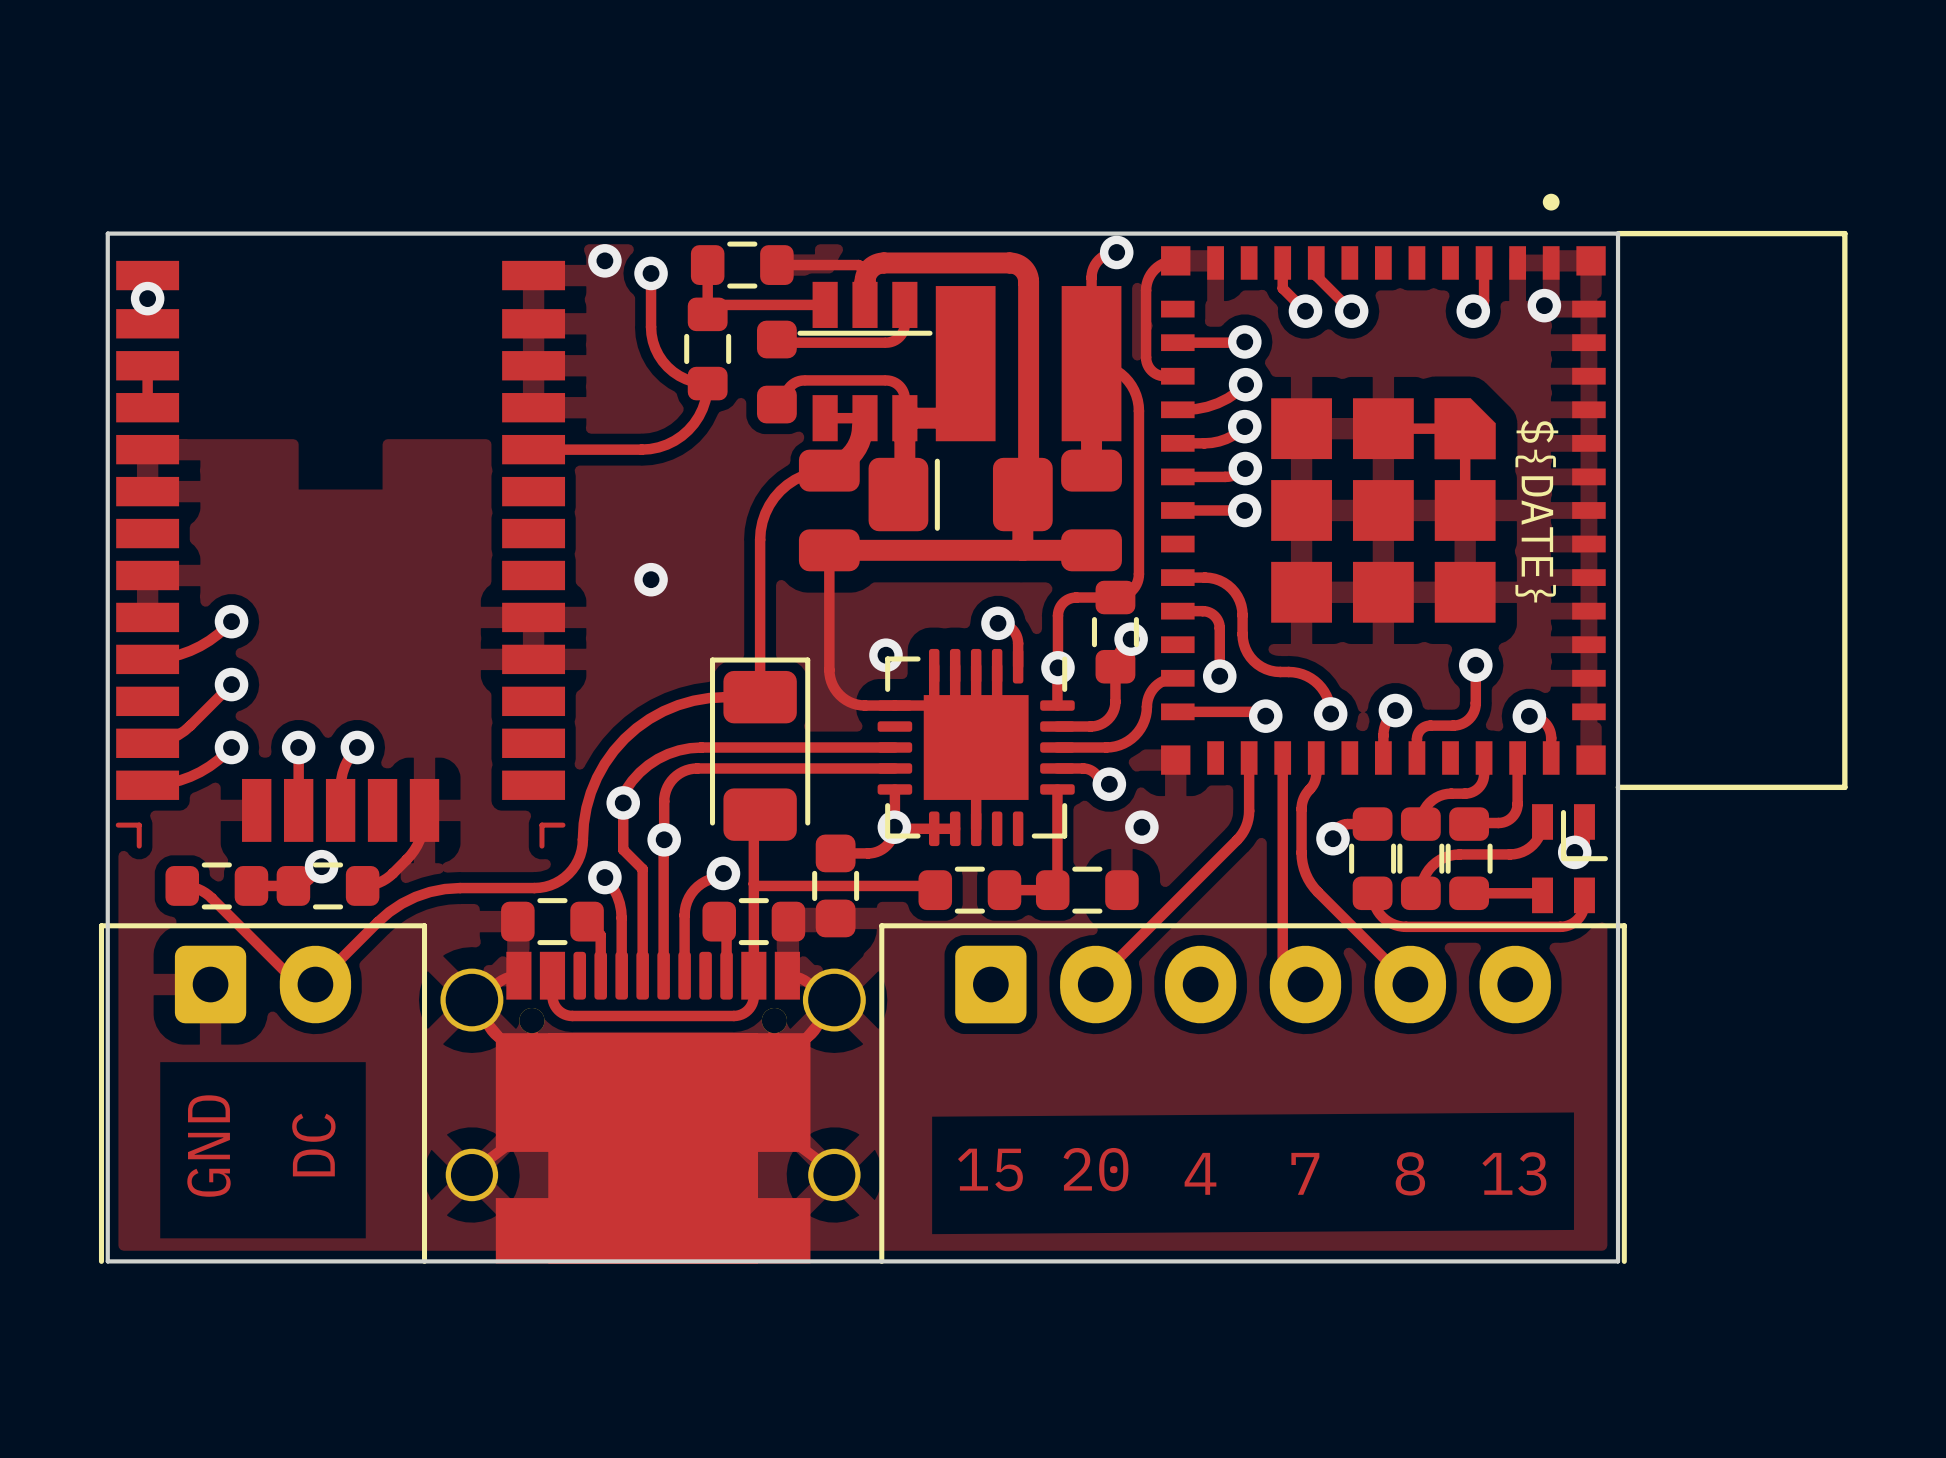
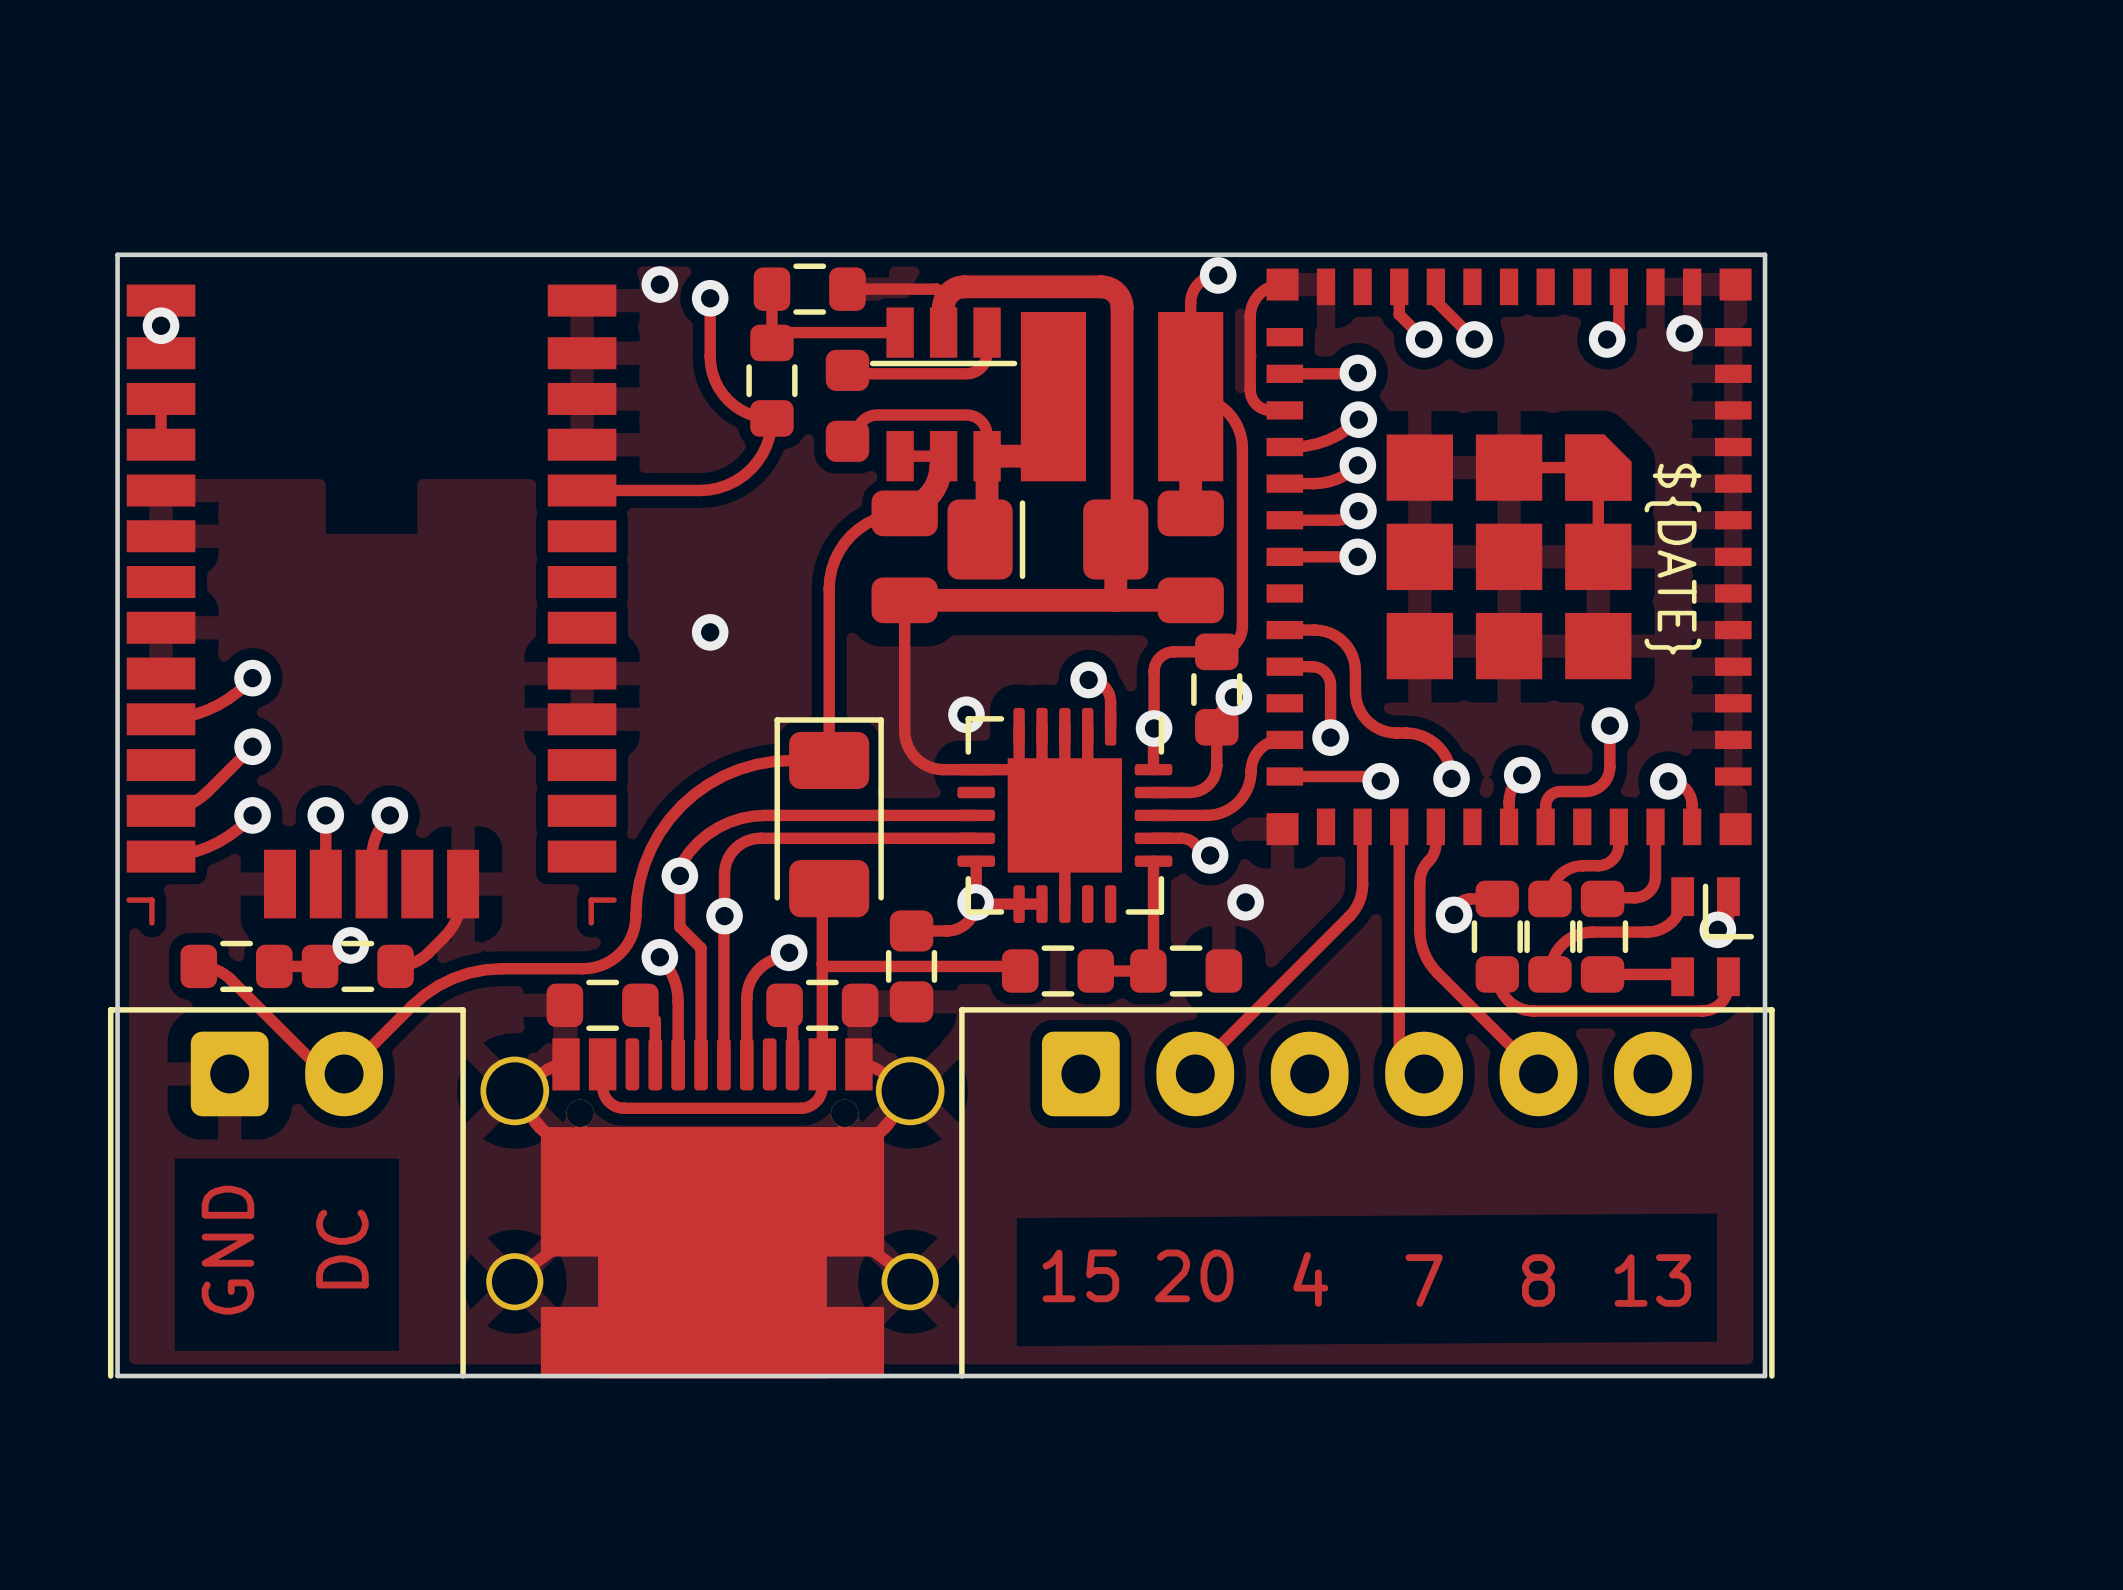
part: (1504, 491) -> none

